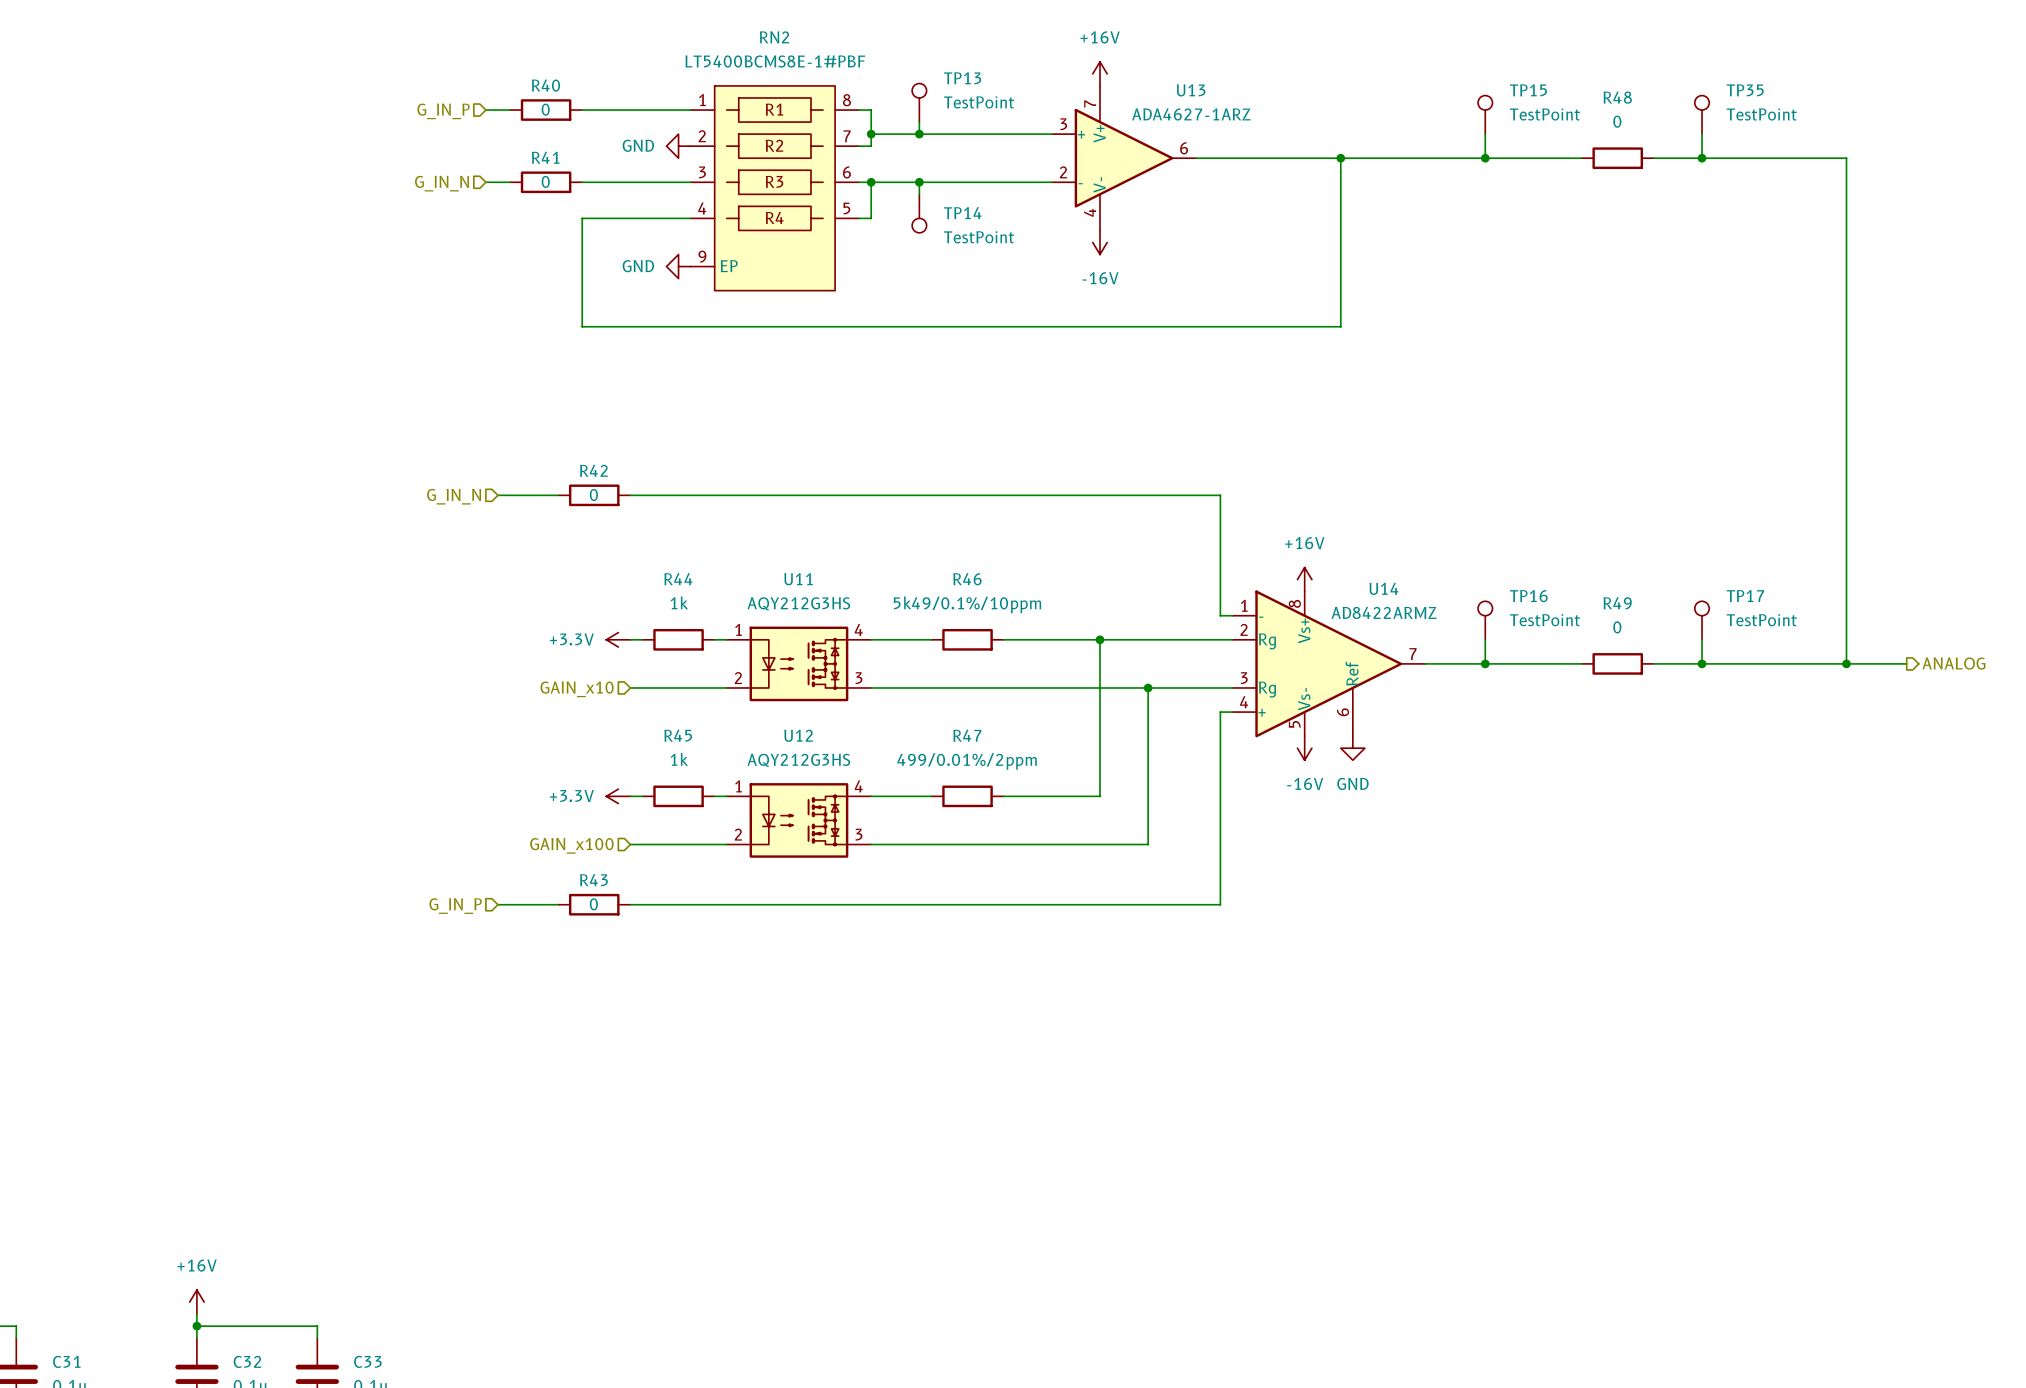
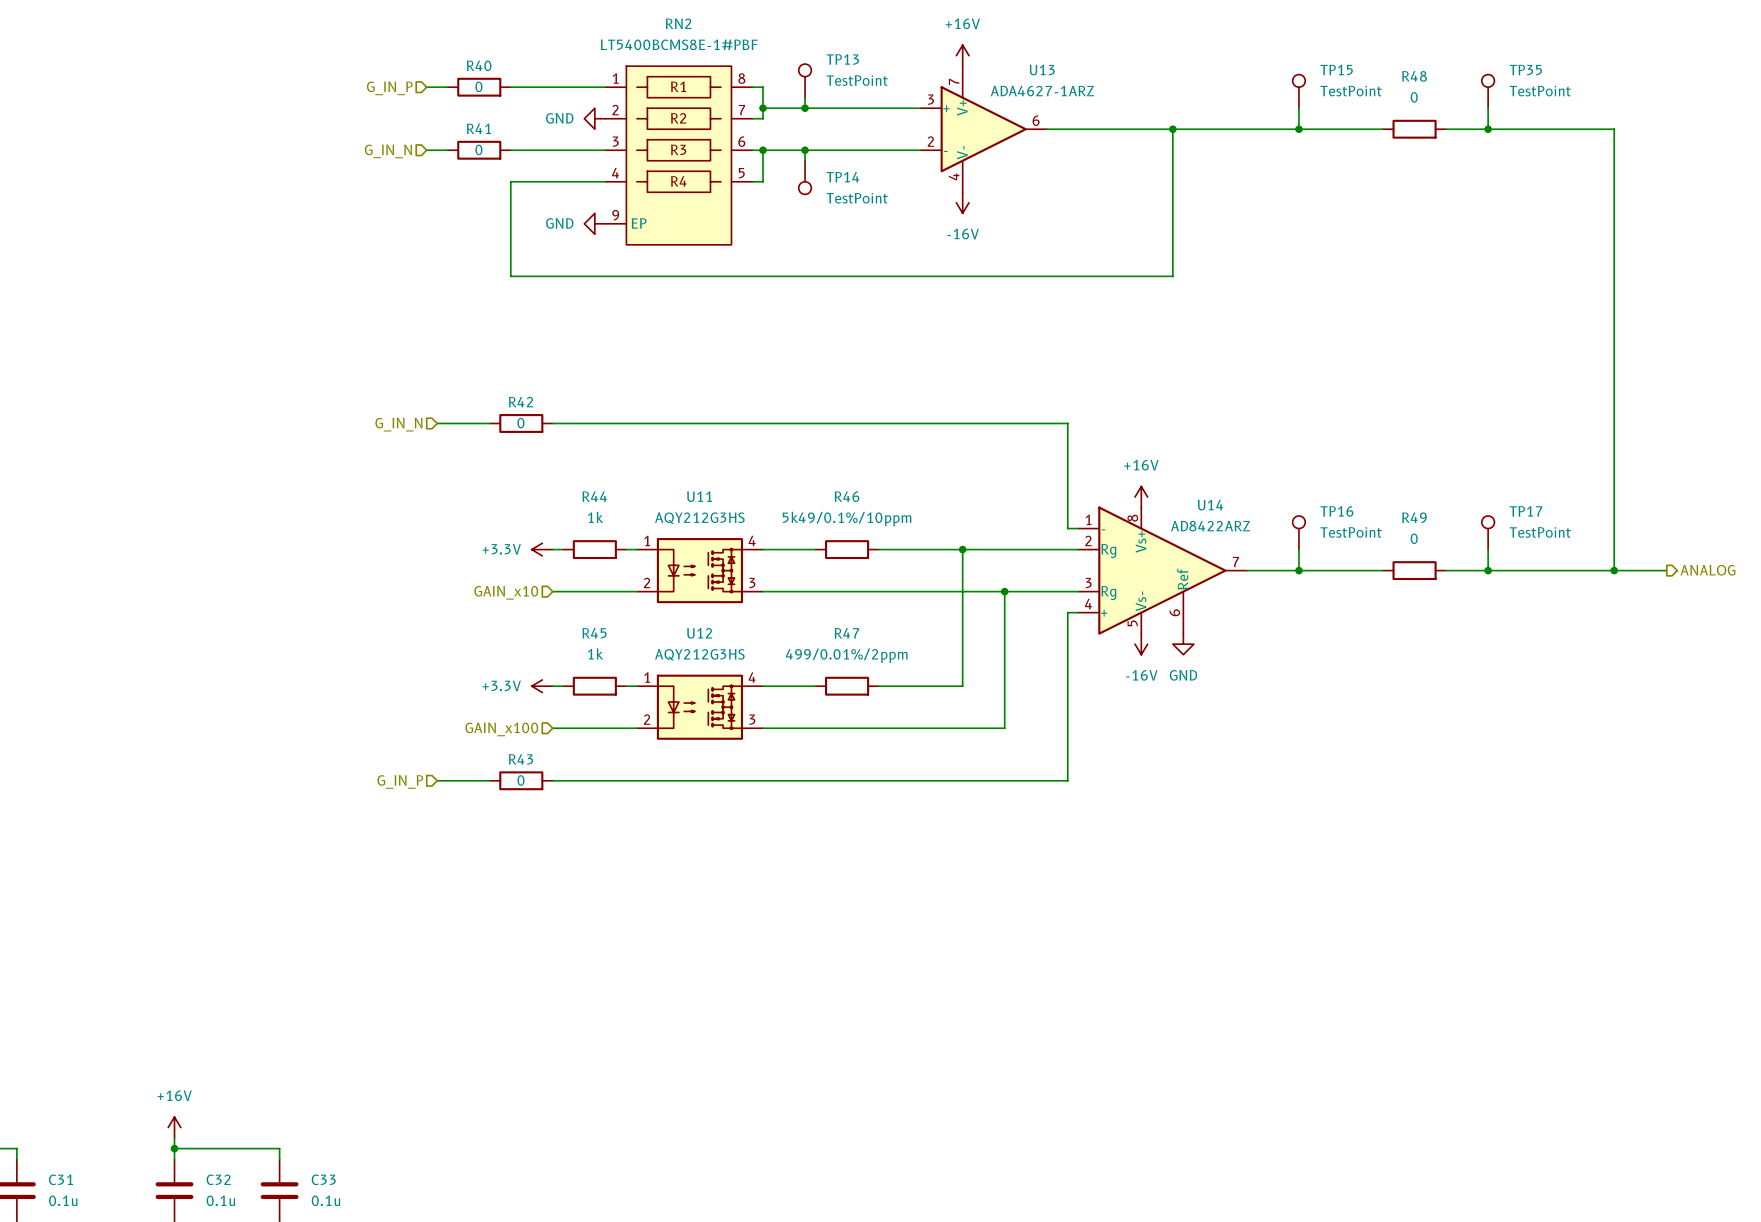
U14 value: AD8422ARMZ (1384, 612) -> AD8422ARZ (1210, 526)

